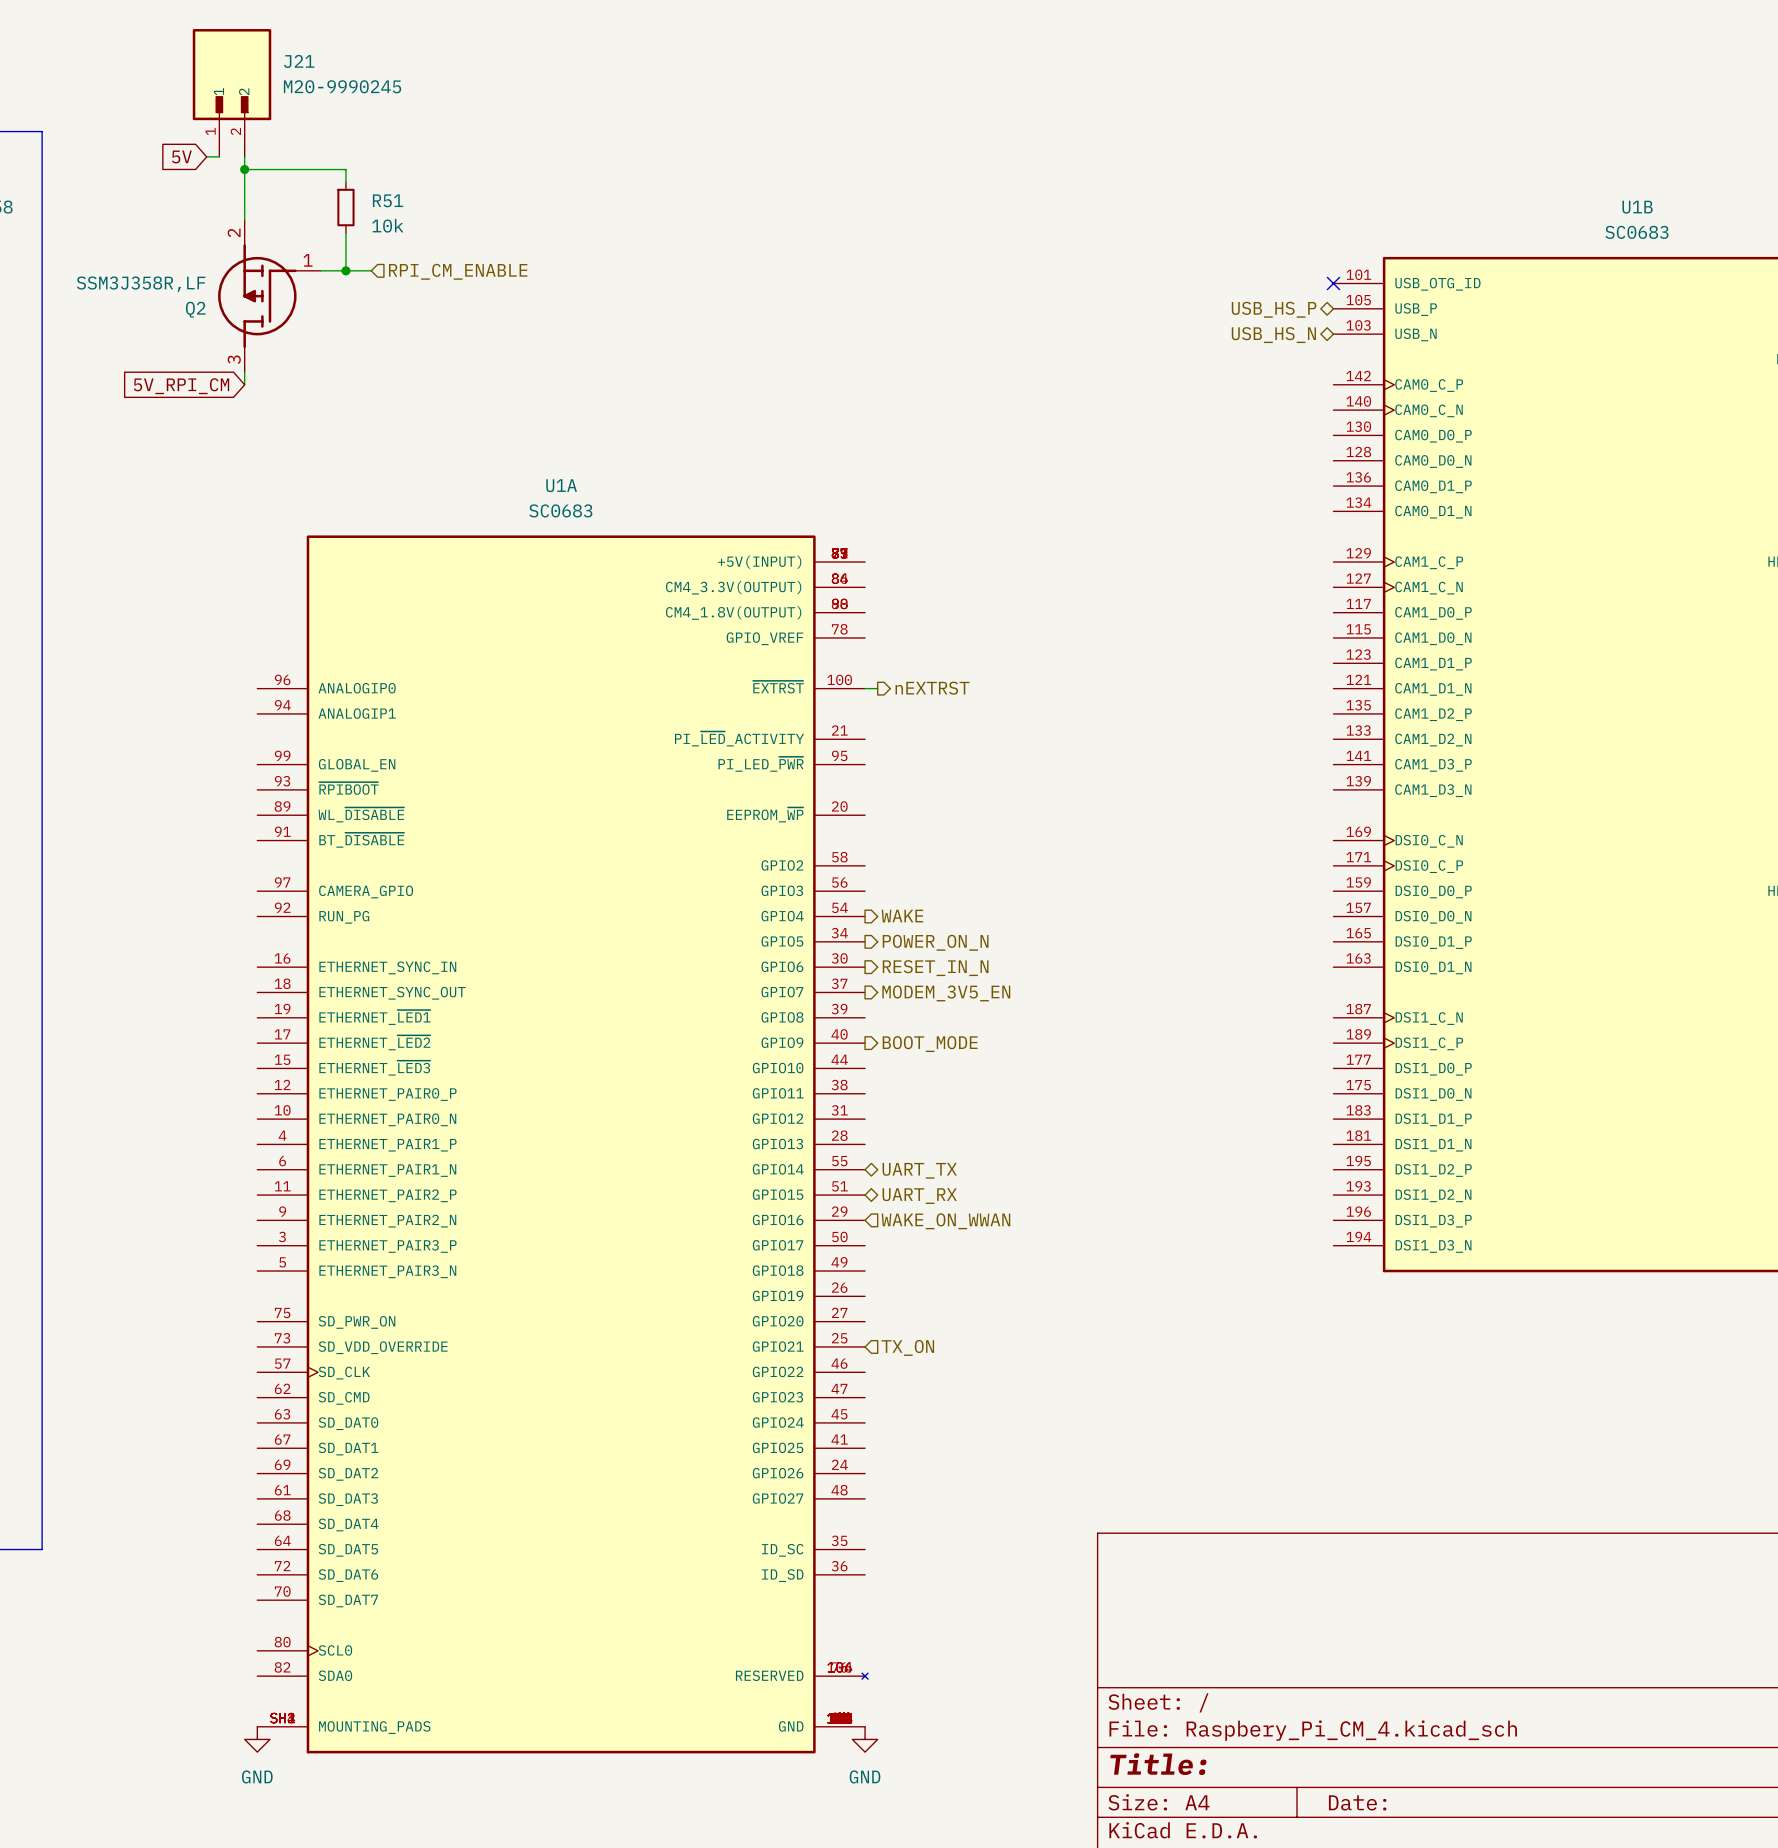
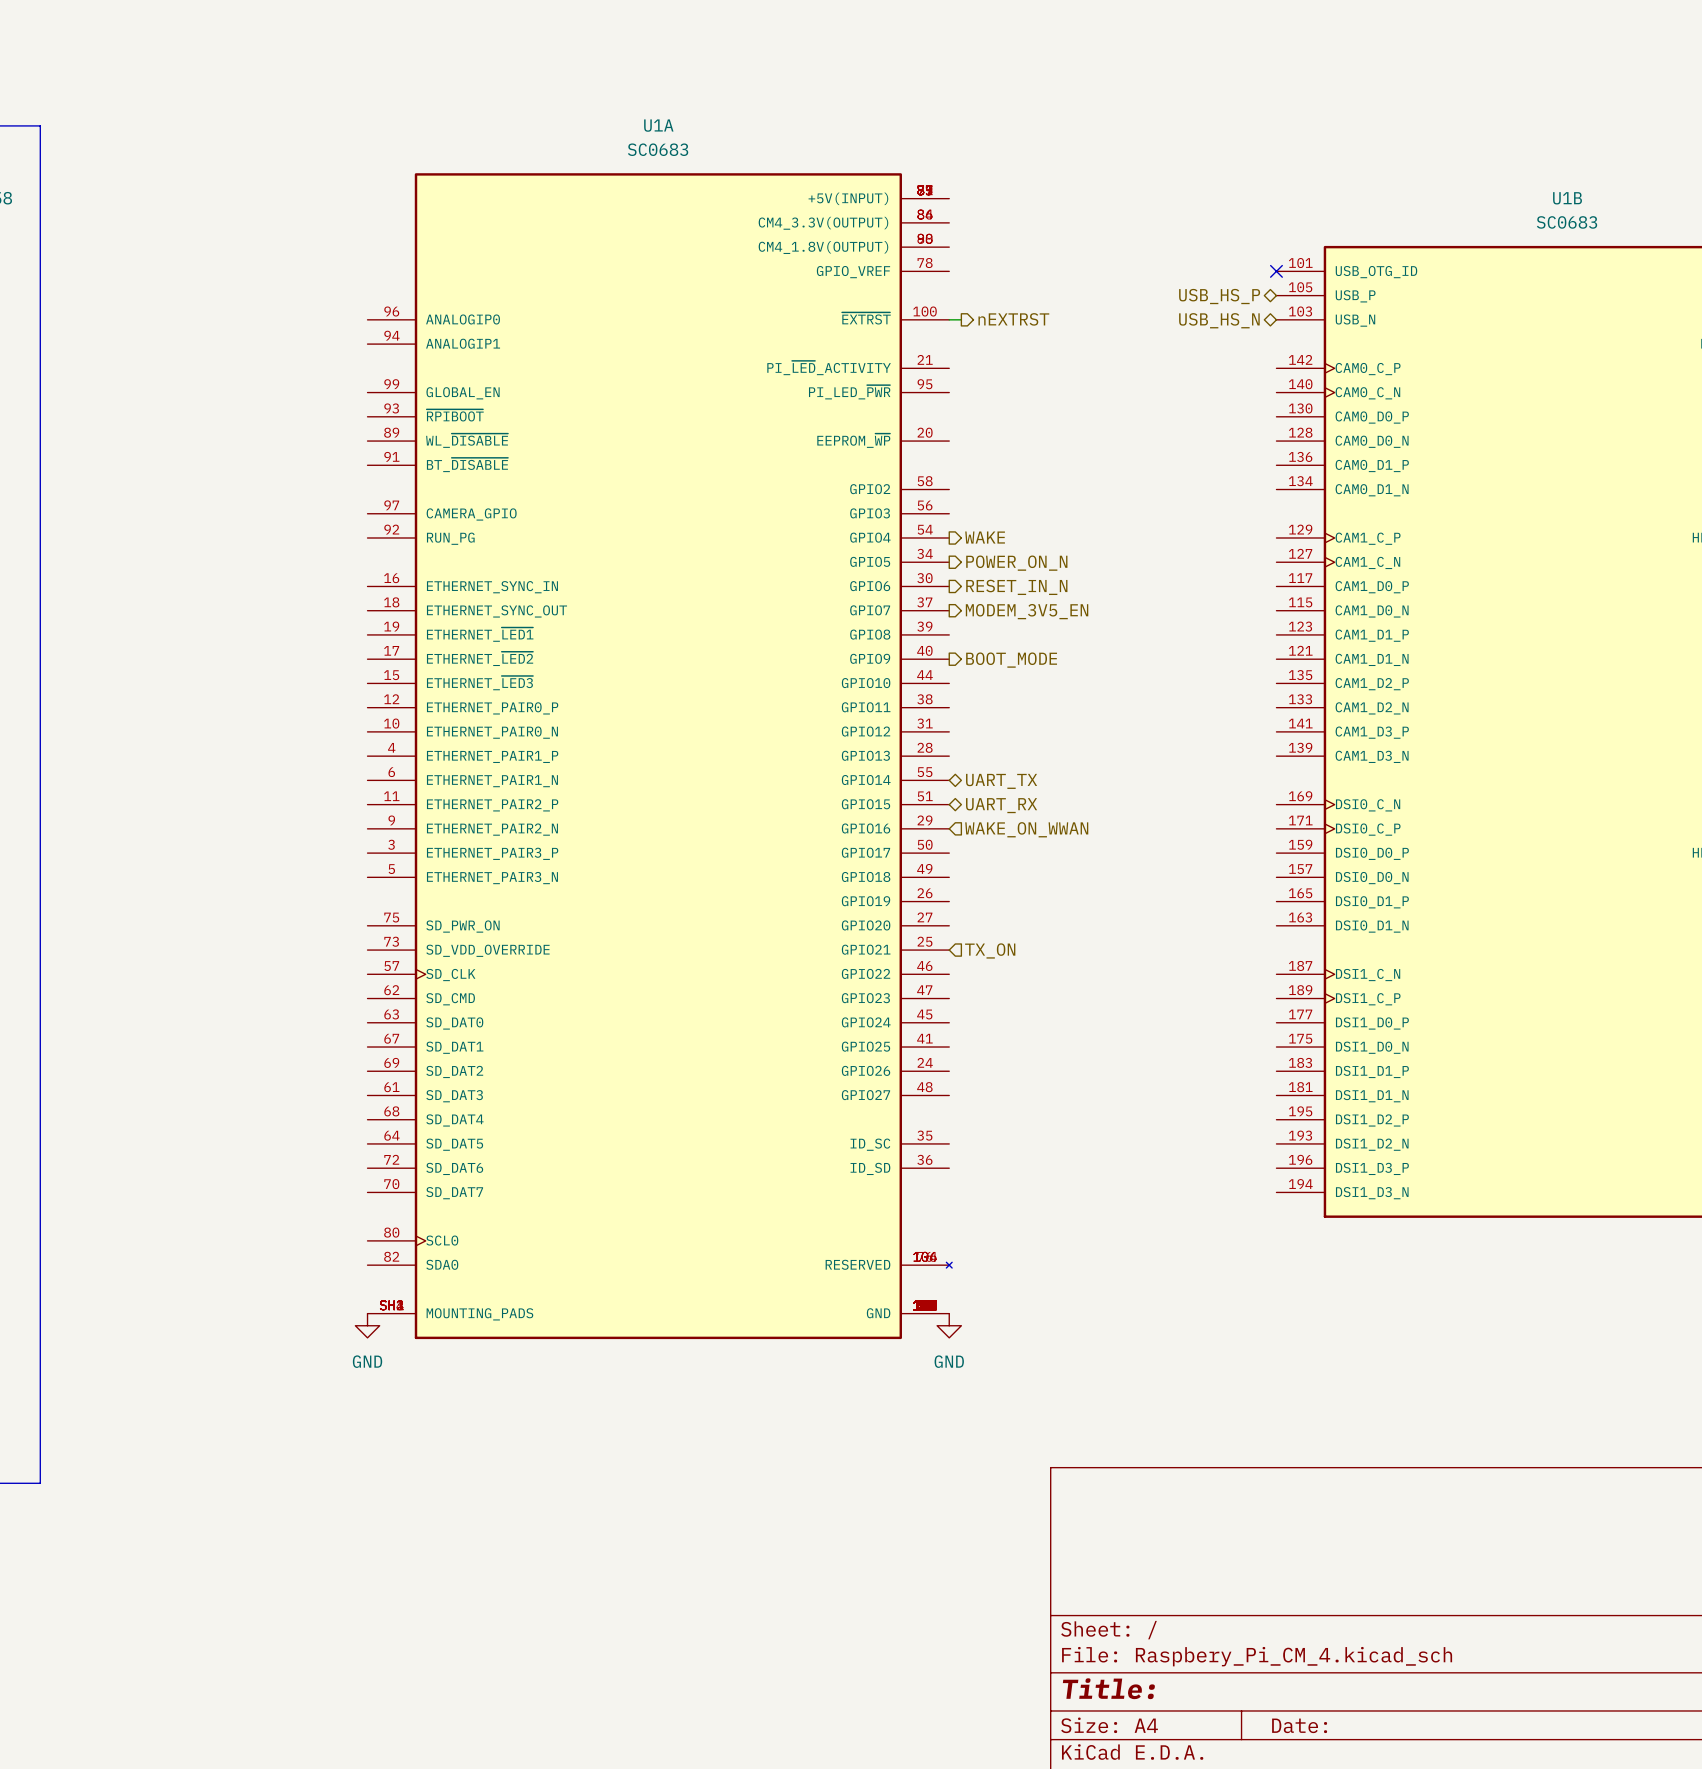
J21: M20-9990245 (232, 92) -> none
global label: 5V (181, 156) -> none
wire: (206, 156) (219, 156) -> none
wire: (244, 156) (244, 220) -> none
wire: (244, 169) (345, 169) (345, 182) -> none
junction: (244, 169) -> none
R51: 10k (345, 207) -> none
wire: (345, 232) (345, 270) -> none
wire: (320, 270) (371, 270) -> none
junction: (345, 270) -> none
hierarchical label: RPI_CM_ENABLE (458, 271) -> none
Q2: SSM3J358R,LF (269, 296) -> none
hierarchical label: none -> nEXTRST (1013, 319)
wire: none -> (949, 319) (961, 319)
wire: (244, 372) (244, 384) -> none
global label: 5V_RPI_CM (181, 386) -> none
hierarchical label: none -> WAKE (985, 537)
hierarchical label: none -> POWER_ON_N (1016, 563)
hierarchical label: none -> RESET_IN_N (1016, 587)
hierarchical label: none -> MODEM_3V5_EN (1027, 611)
hierarchical label: nEXTRST (932, 688) -> none
hierarchical label: none -> BOOT_MODE (1011, 660)
hierarchical label: none -> UART_TX (1001, 781)
hierarchical label: none -> UART_RX (1001, 805)
hierarchical label: none -> WAKE_ON_WWAN (1026, 829)
hierarchical label: WAKE (902, 916) -> none
hierarchical label: POWER_ON_N (935, 942) -> none
hierarchical label: RESET_IN_N (935, 968) -> none
hierarchical label: MODEM_3V5_EN (946, 993) -> none
hierarchical label: none -> TX_ON (990, 950)
hierarchical label: BOOT_MODE (930, 1044) -> none
U1A position: (562, 1144) -> (659, 756)
hierarchical label: UART_TX (919, 1170) -> none
hierarchical label: UART_RX (919, 1196) -> none
hierarchical label: WAKE_ON_WWAN (946, 1221) -> none
hierarchical label: TX_ON (907, 1347) -> none
power symbol: none -> GND (367, 1325)
power symbol: none -> GND (949, 1325)
power symbol: GND (257, 1739) -> none
power symbol: GND (865, 1739) -> none

